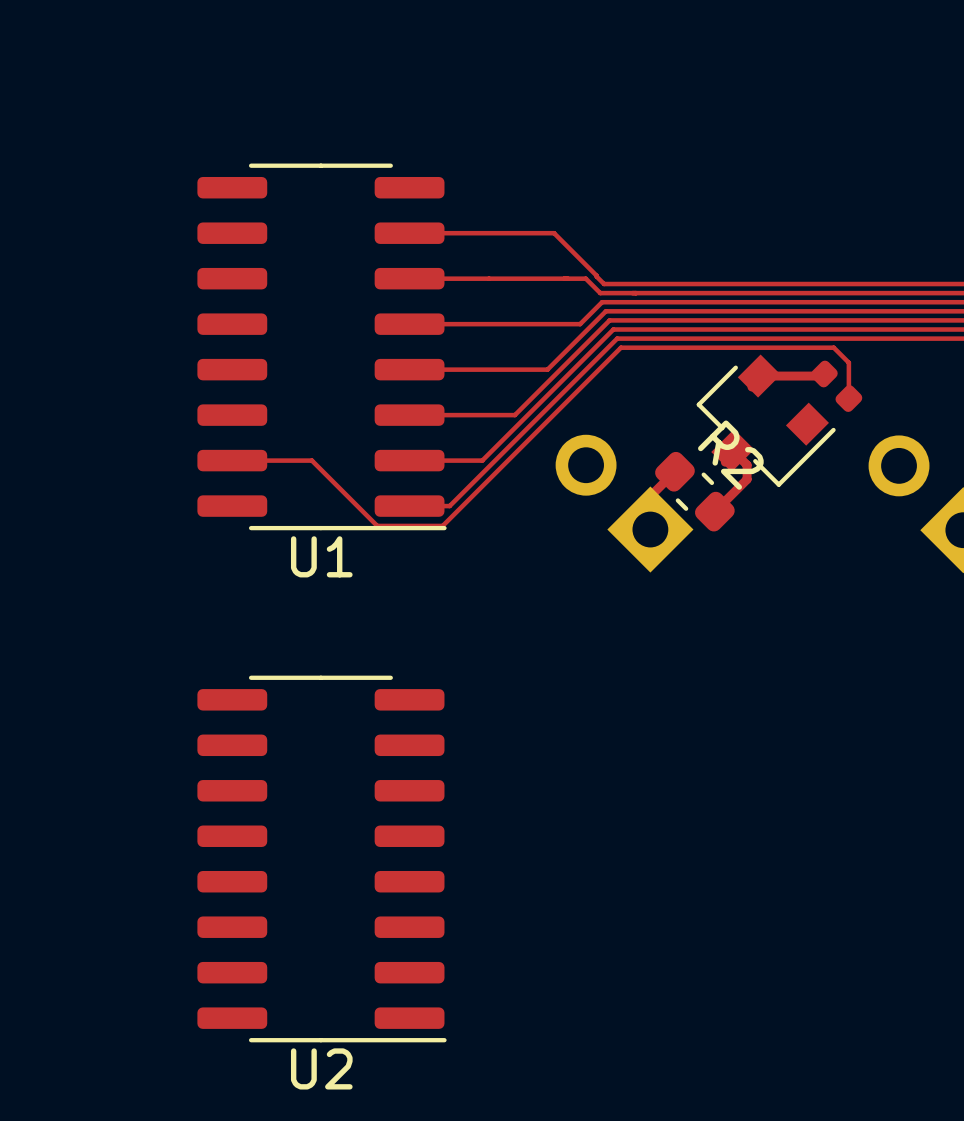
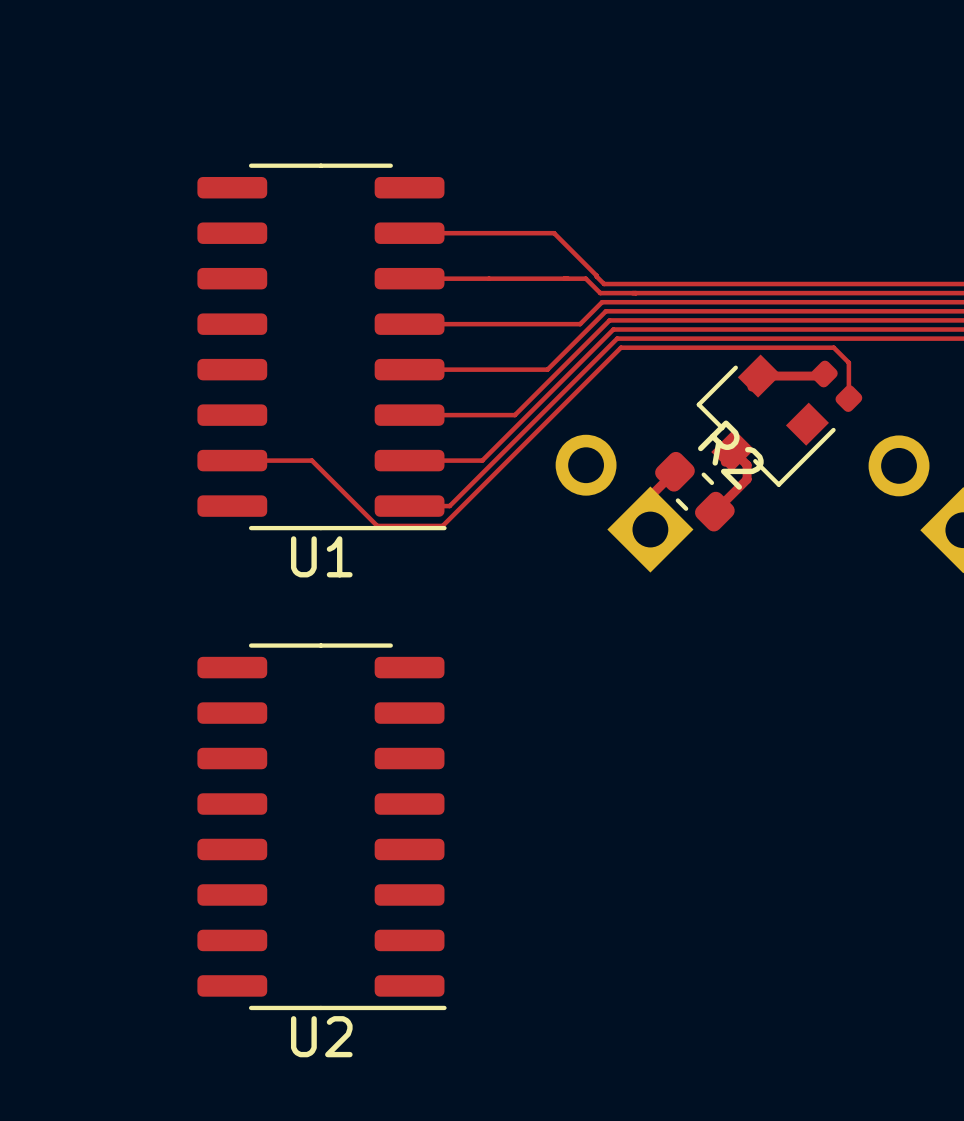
U2 position: (322, 858) -> (322, 826)

